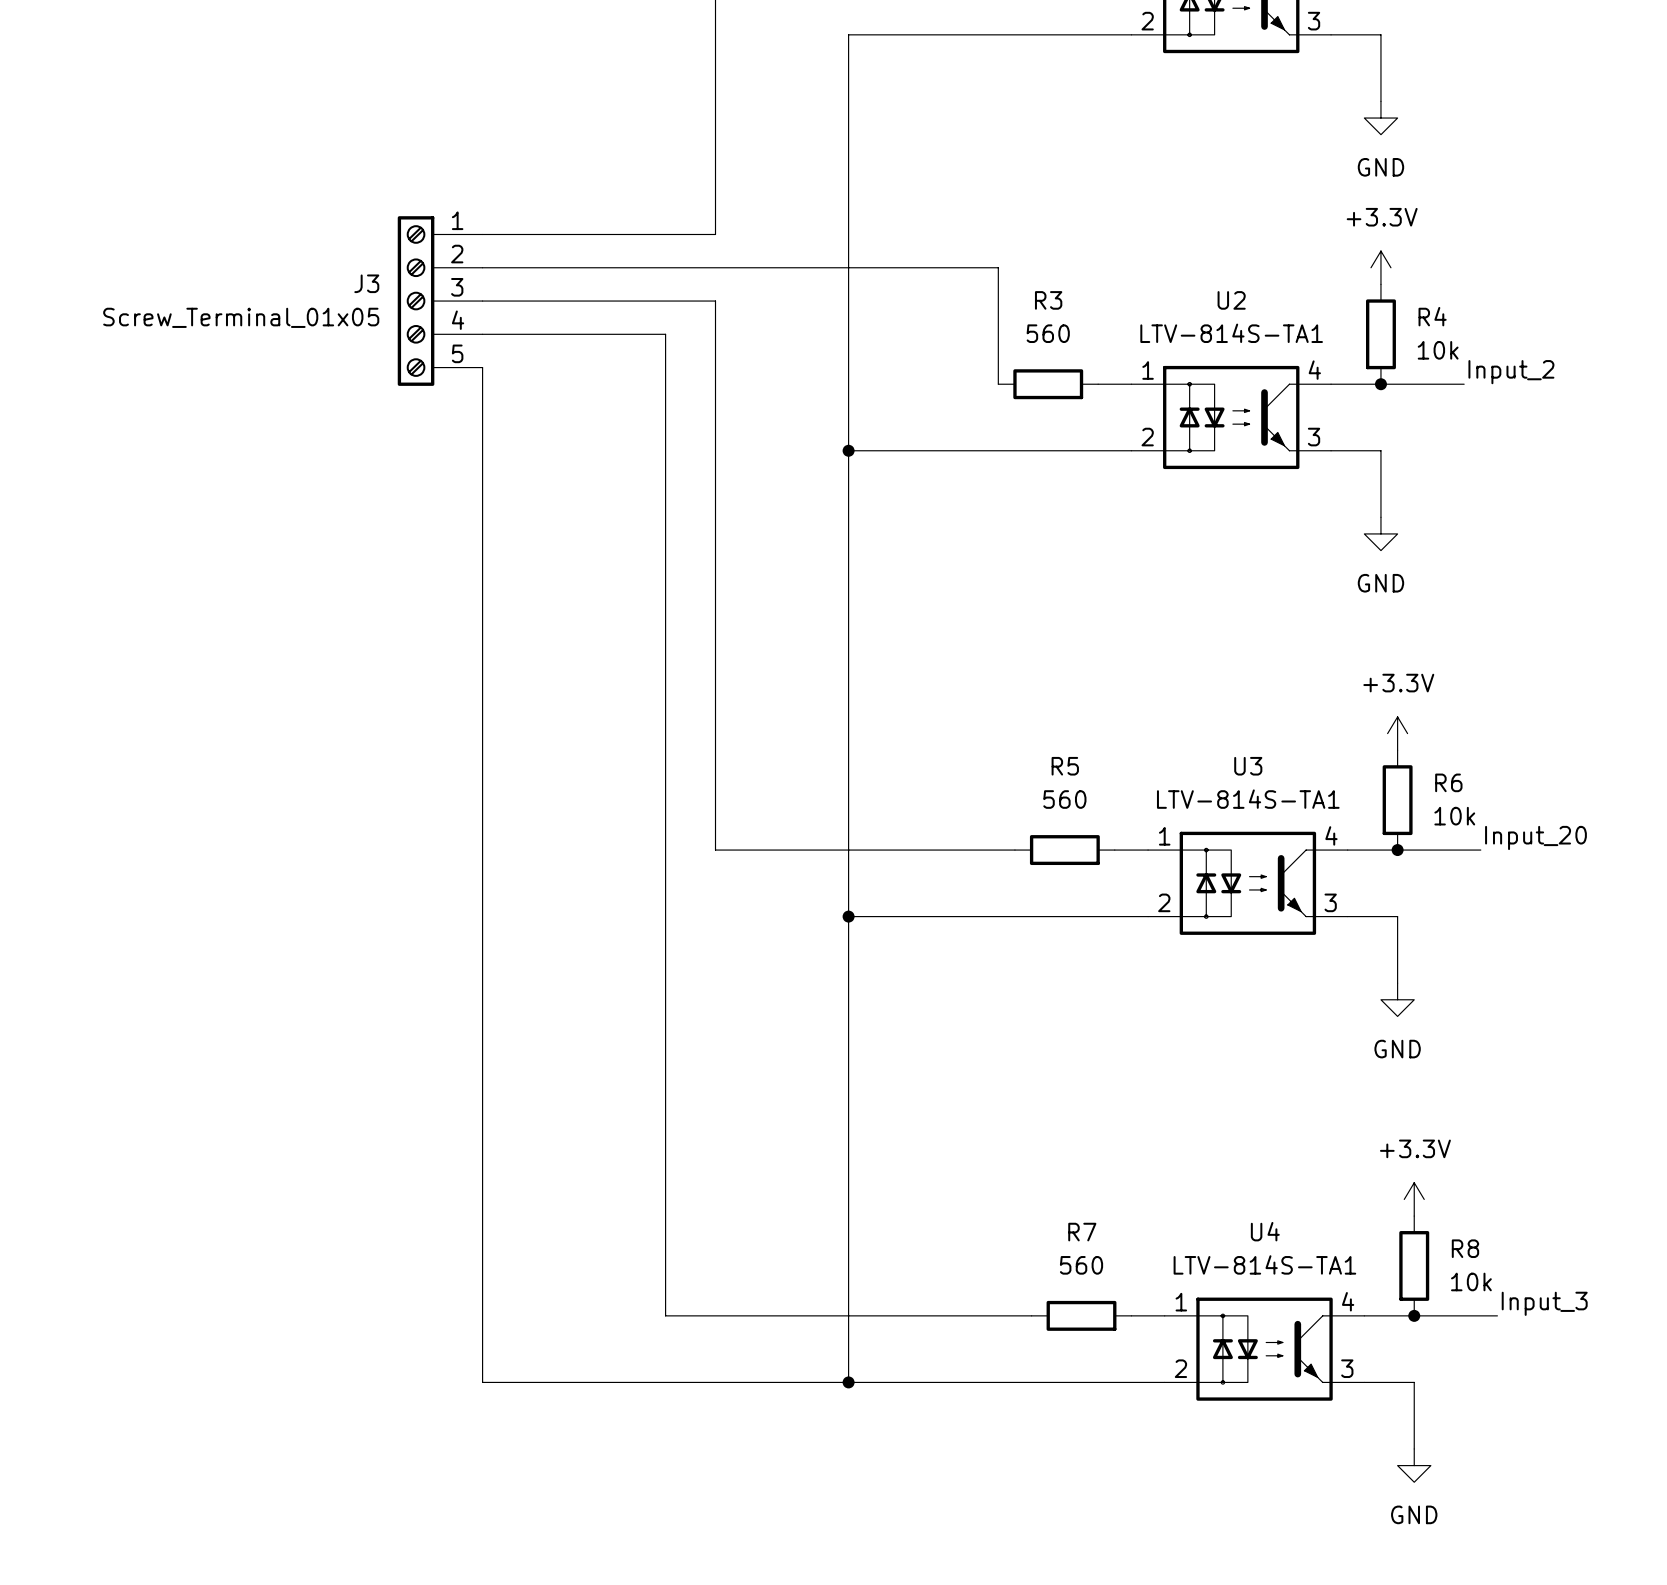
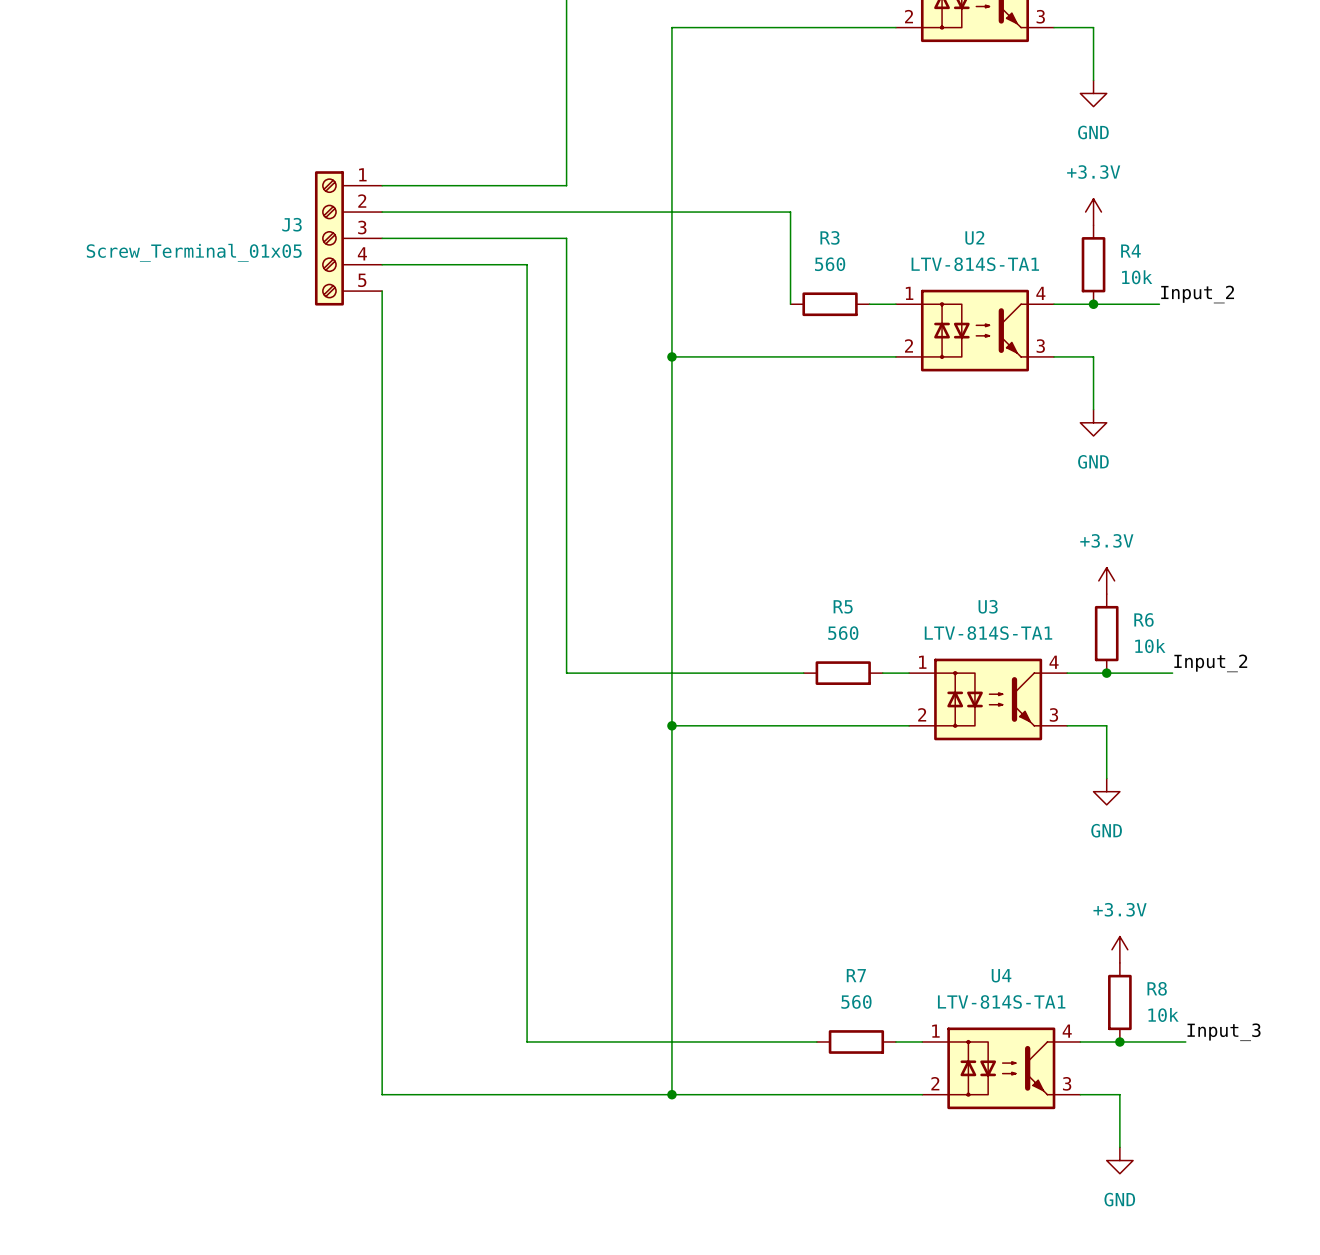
label: Input_20 (1535, 837) -> Input_2 (1210, 663)

